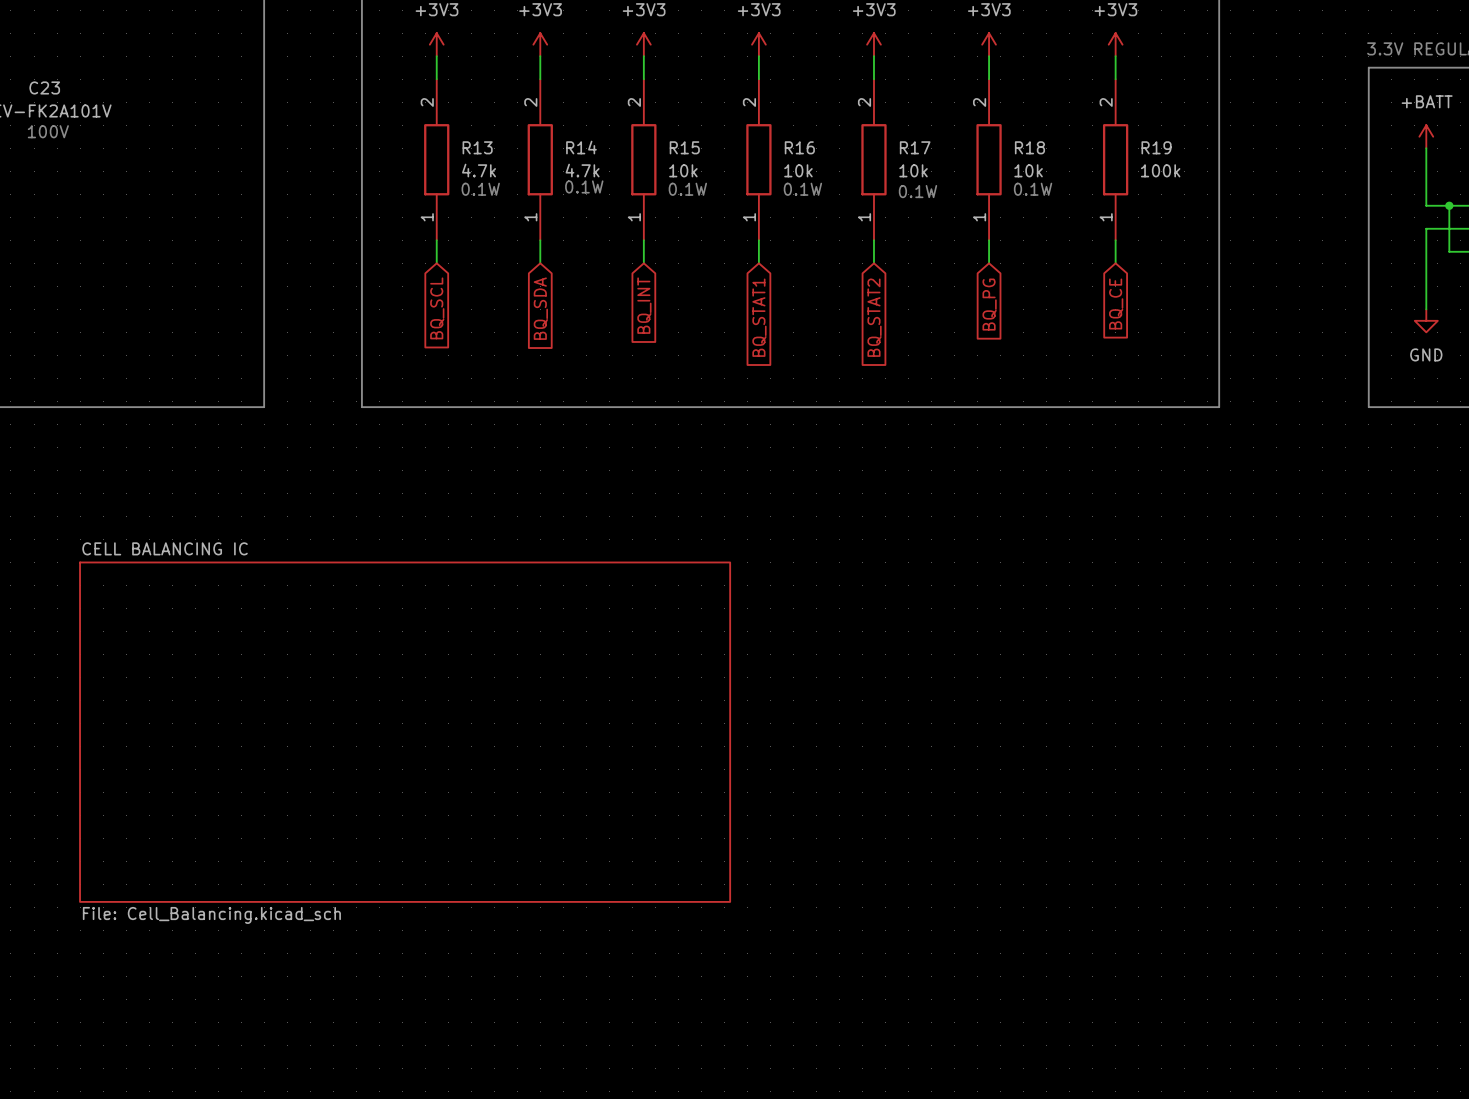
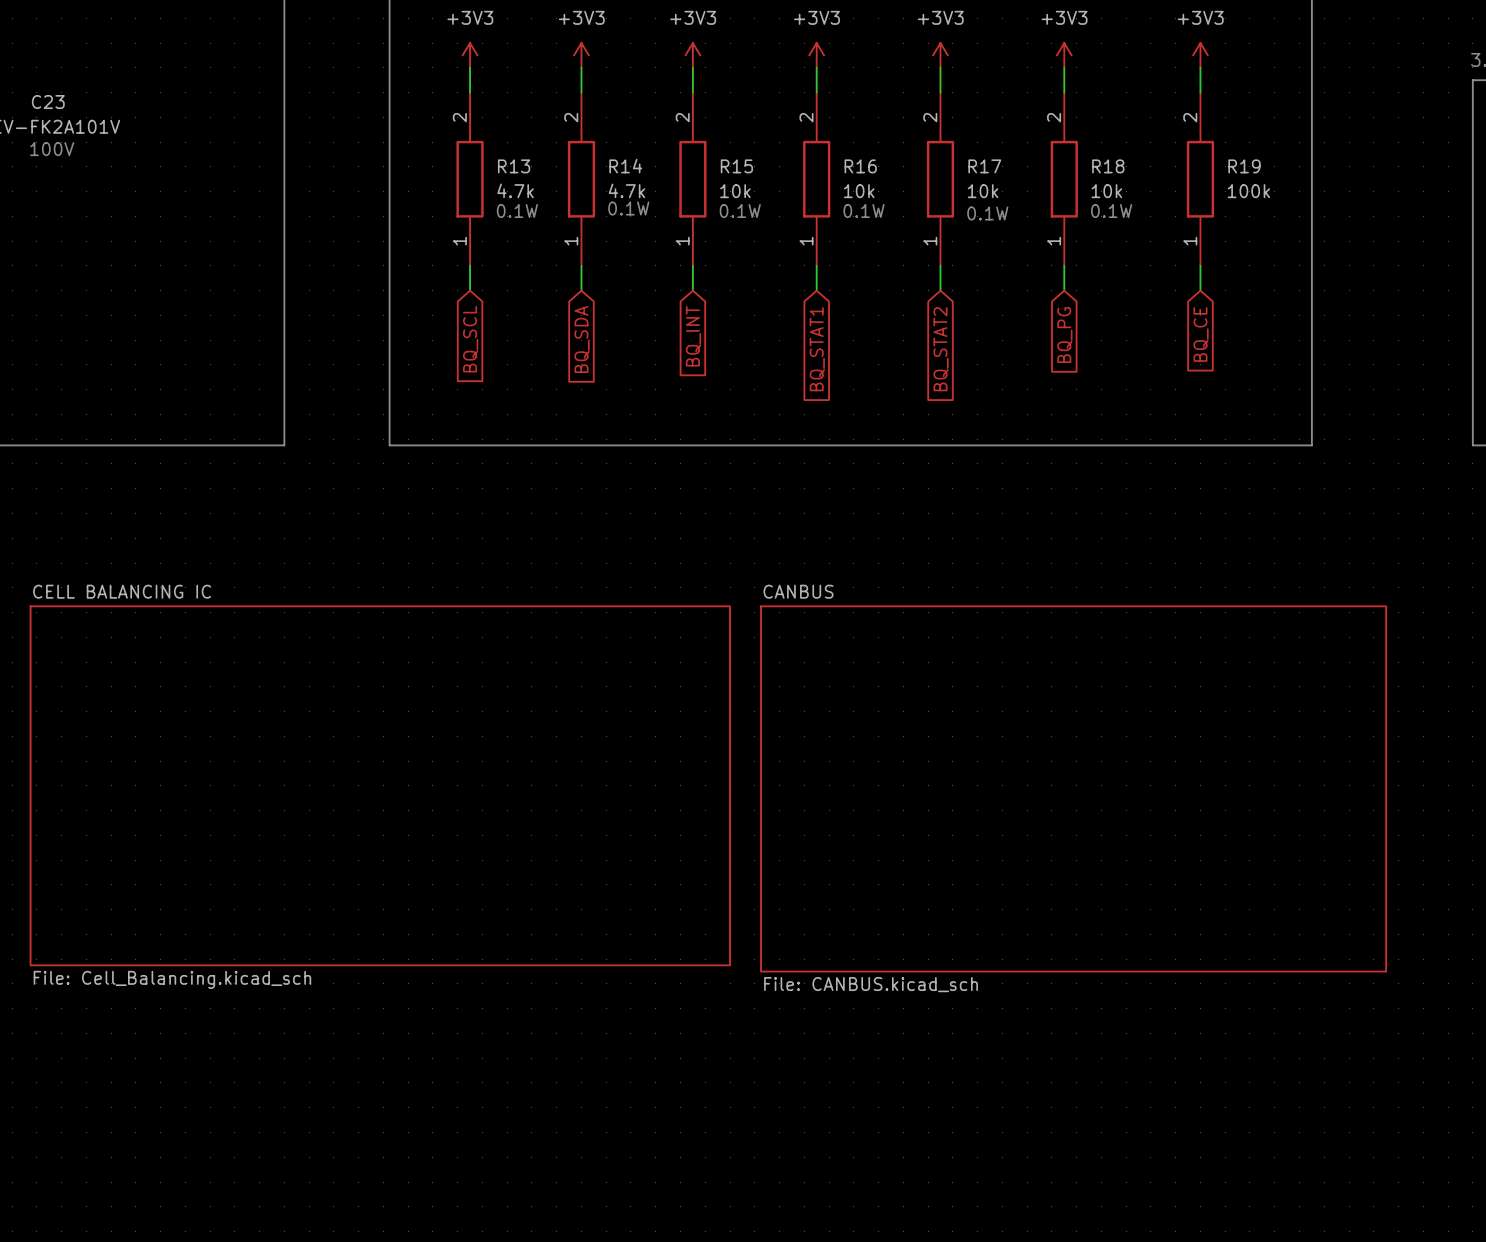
sheet CELL BALANCING IC: none -> File: Cell_Balancing.kicad_sch (380, 785)
sheet CANBUS: none -> File: CANBUS.kicad_sch (1073, 788)
sheet CELL BALANCING IC: File: Cell_Balancing.kicad_sch (405, 732) -> none

